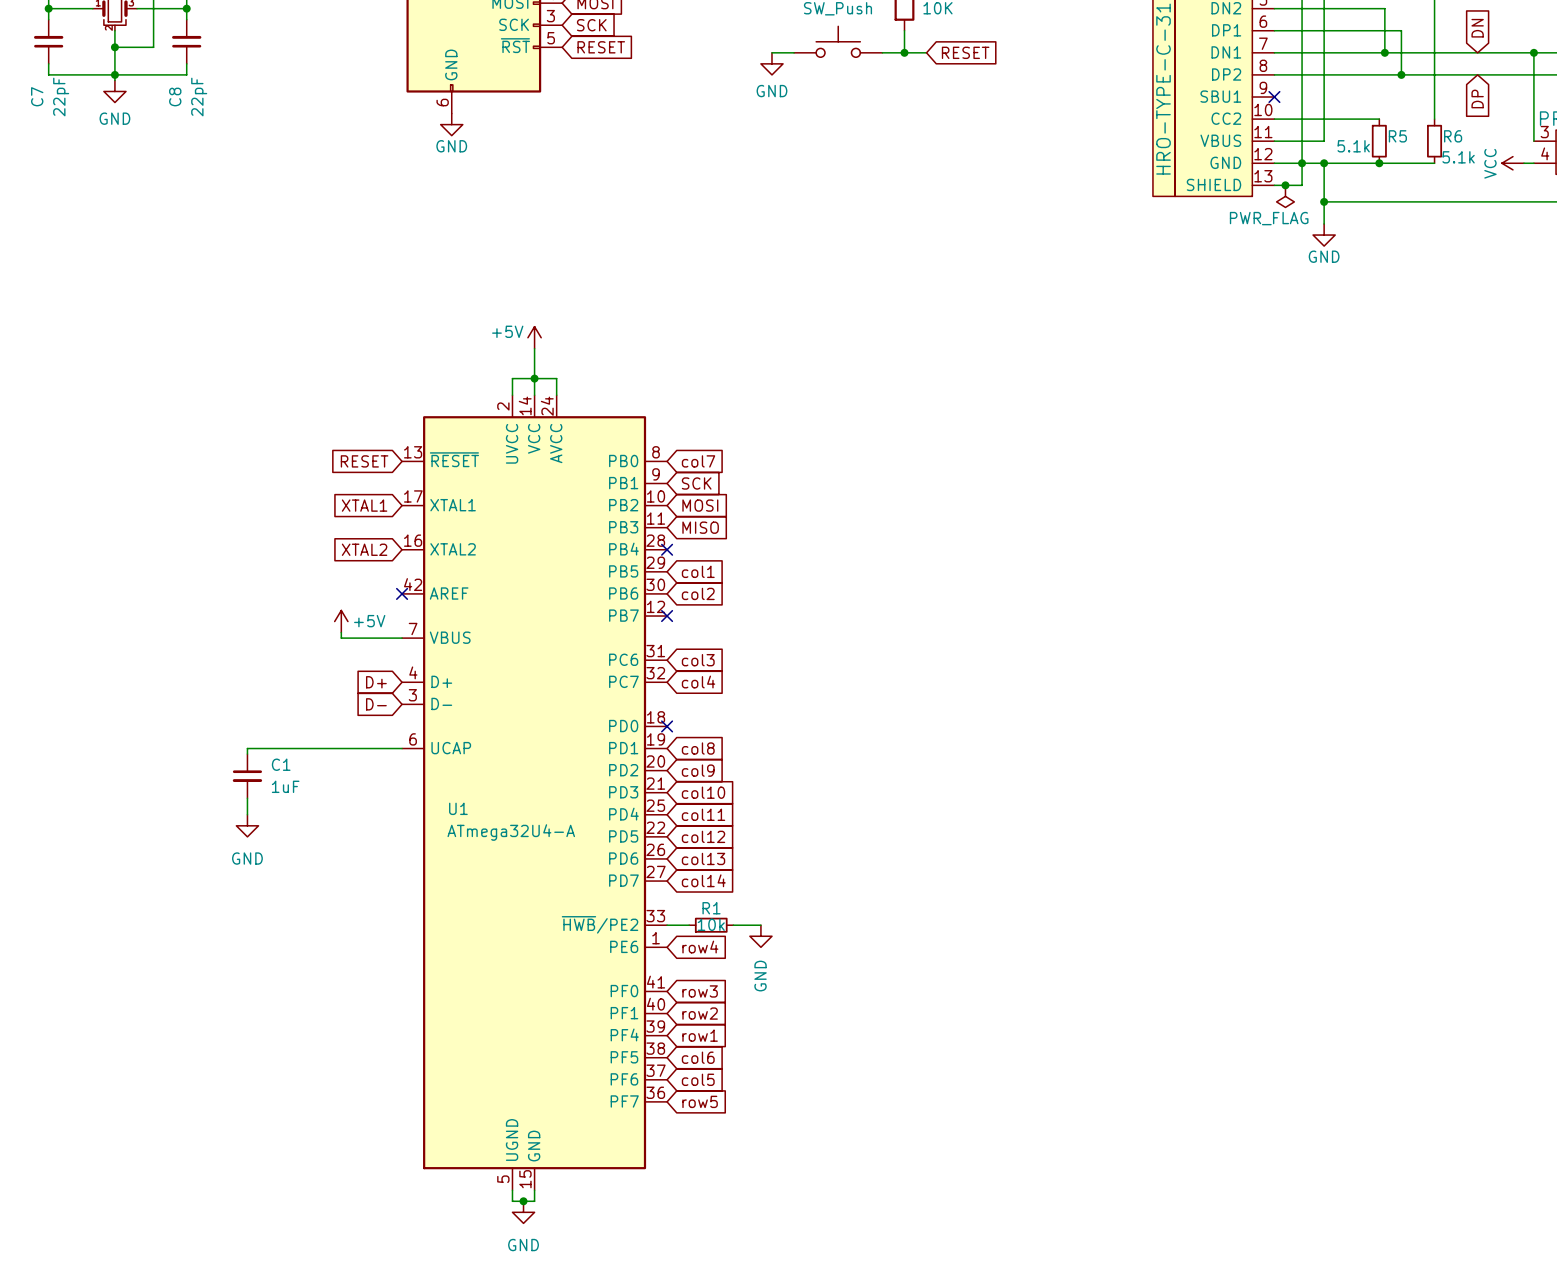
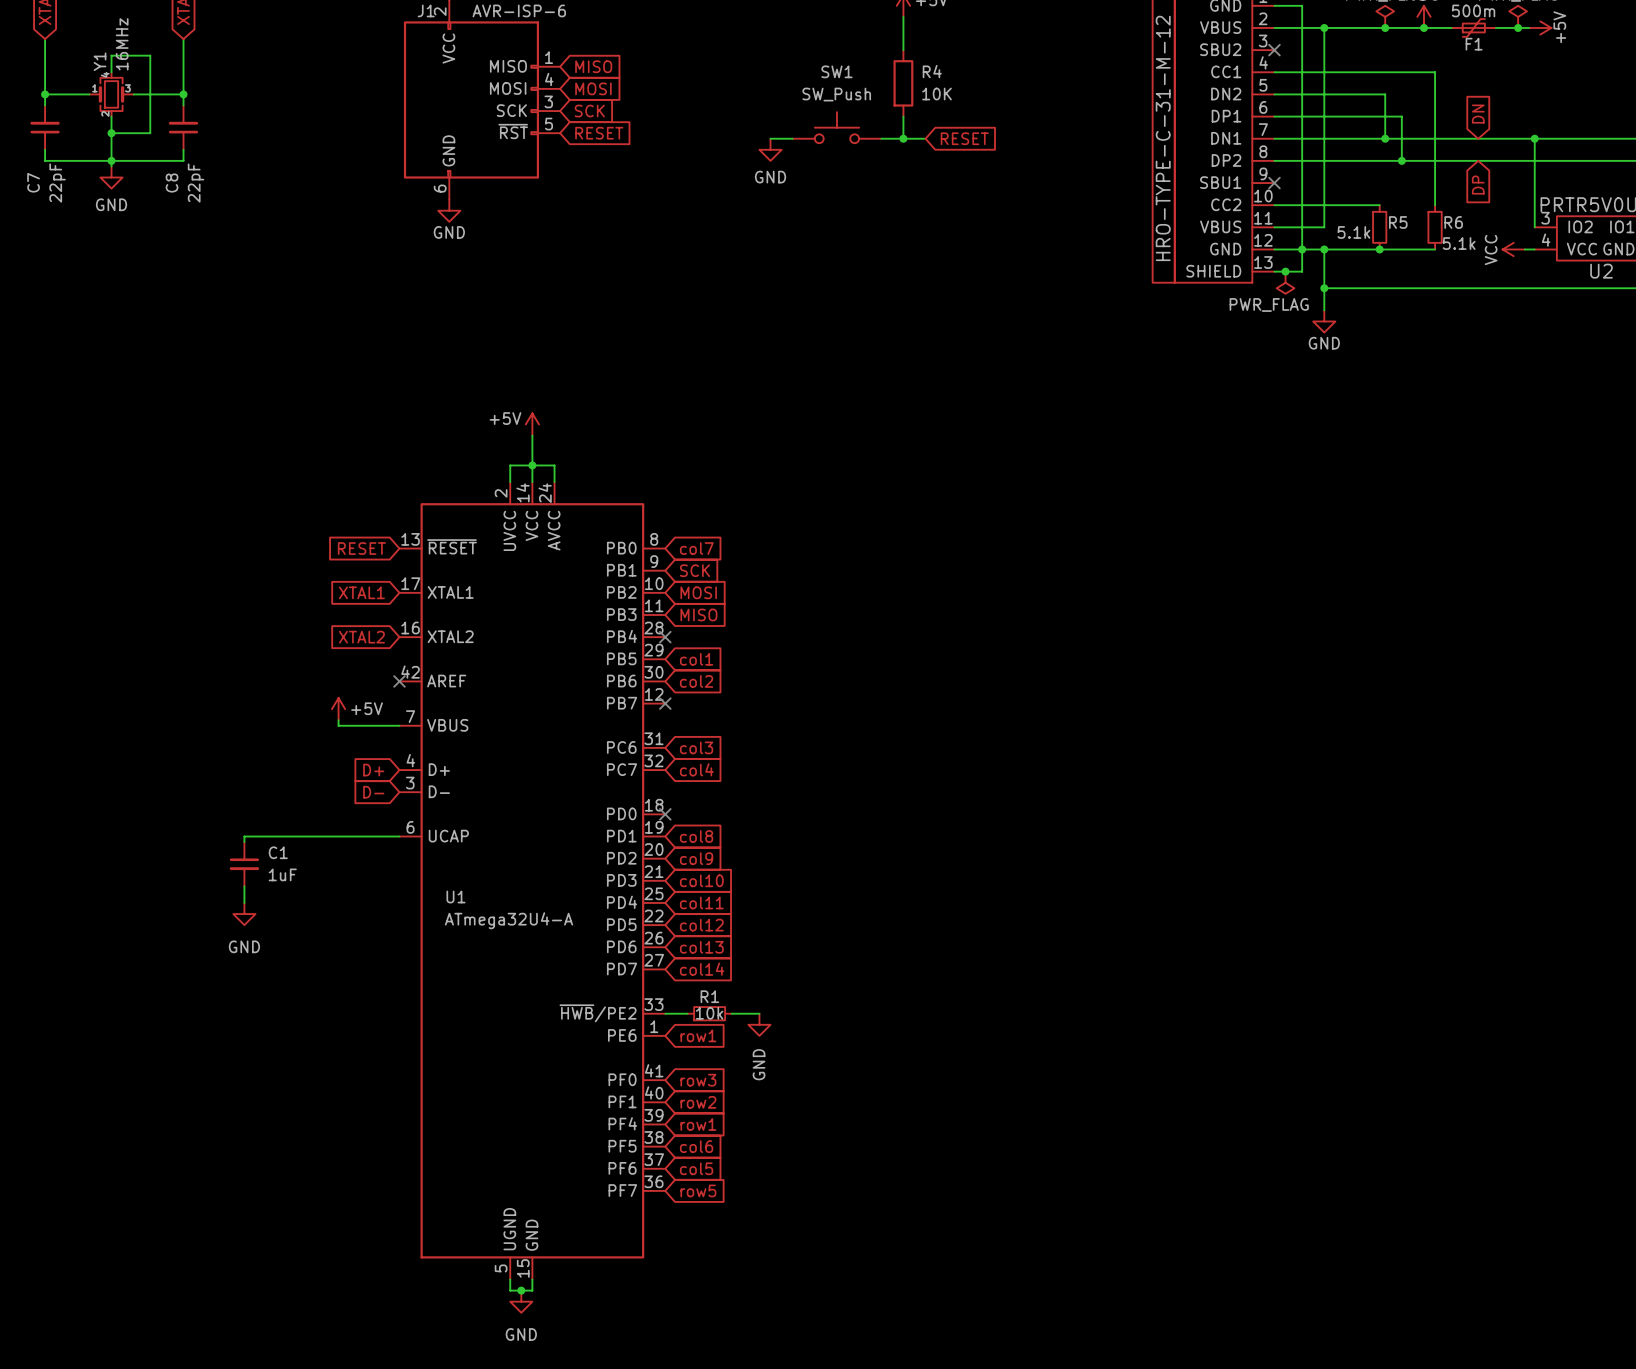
global label: row4 (700, 947) -> row1 (698, 1035)

